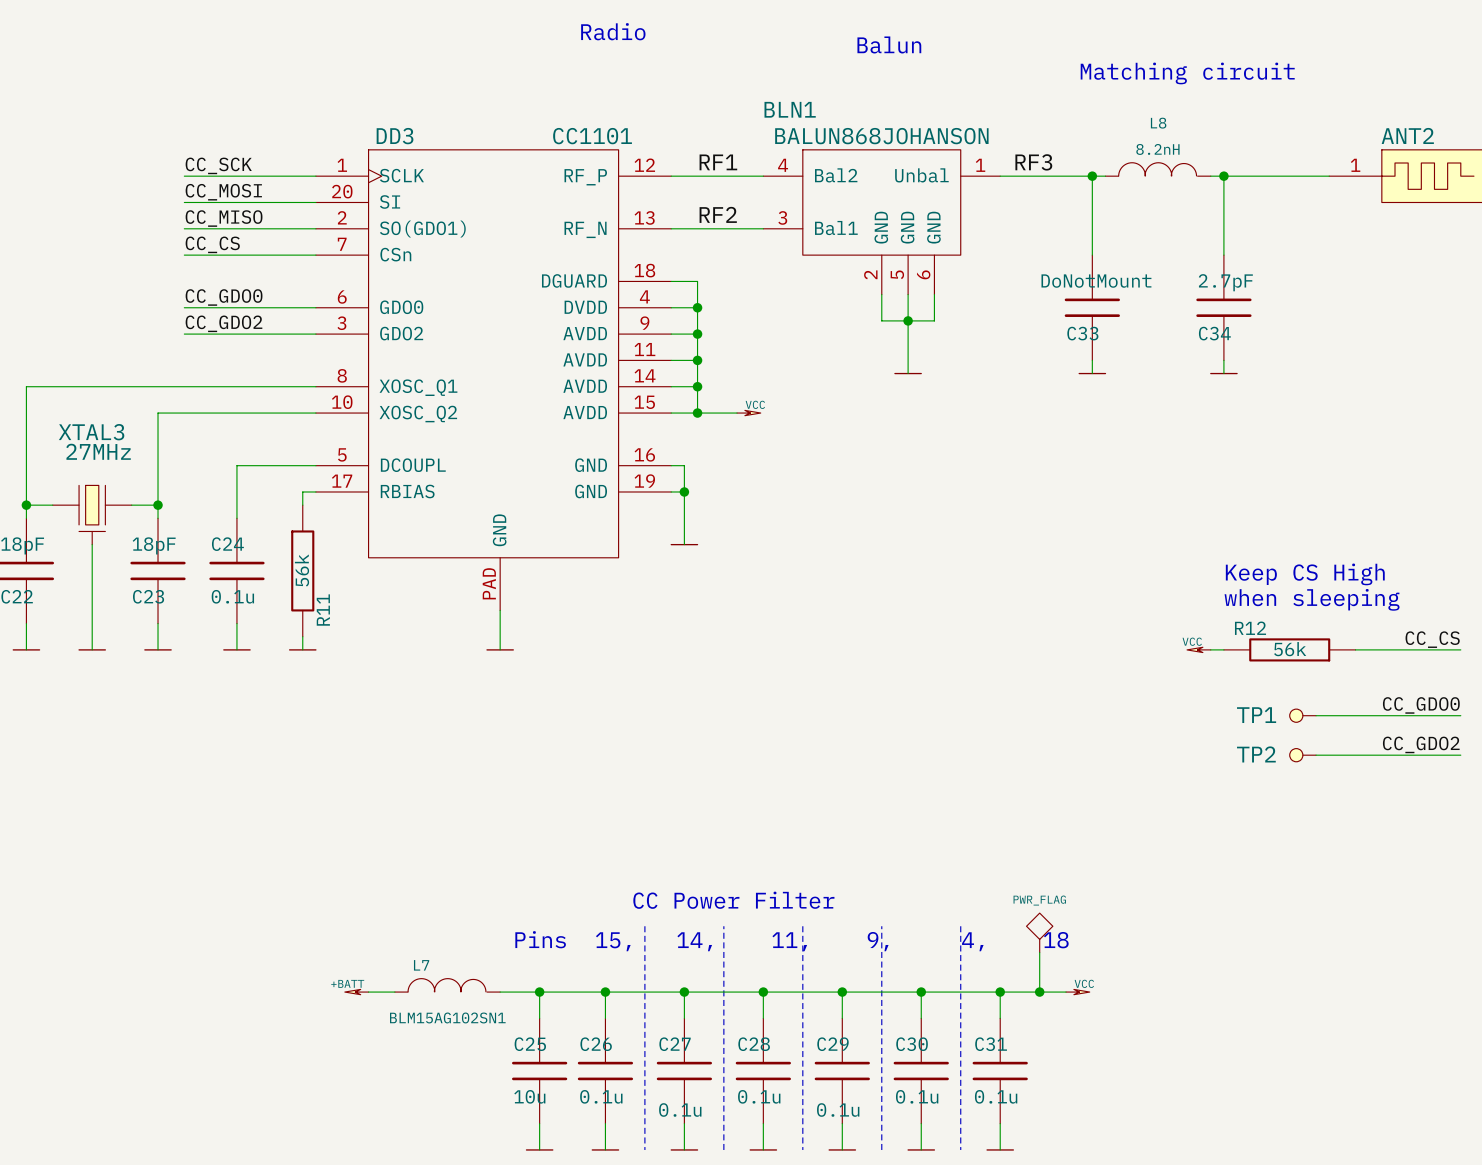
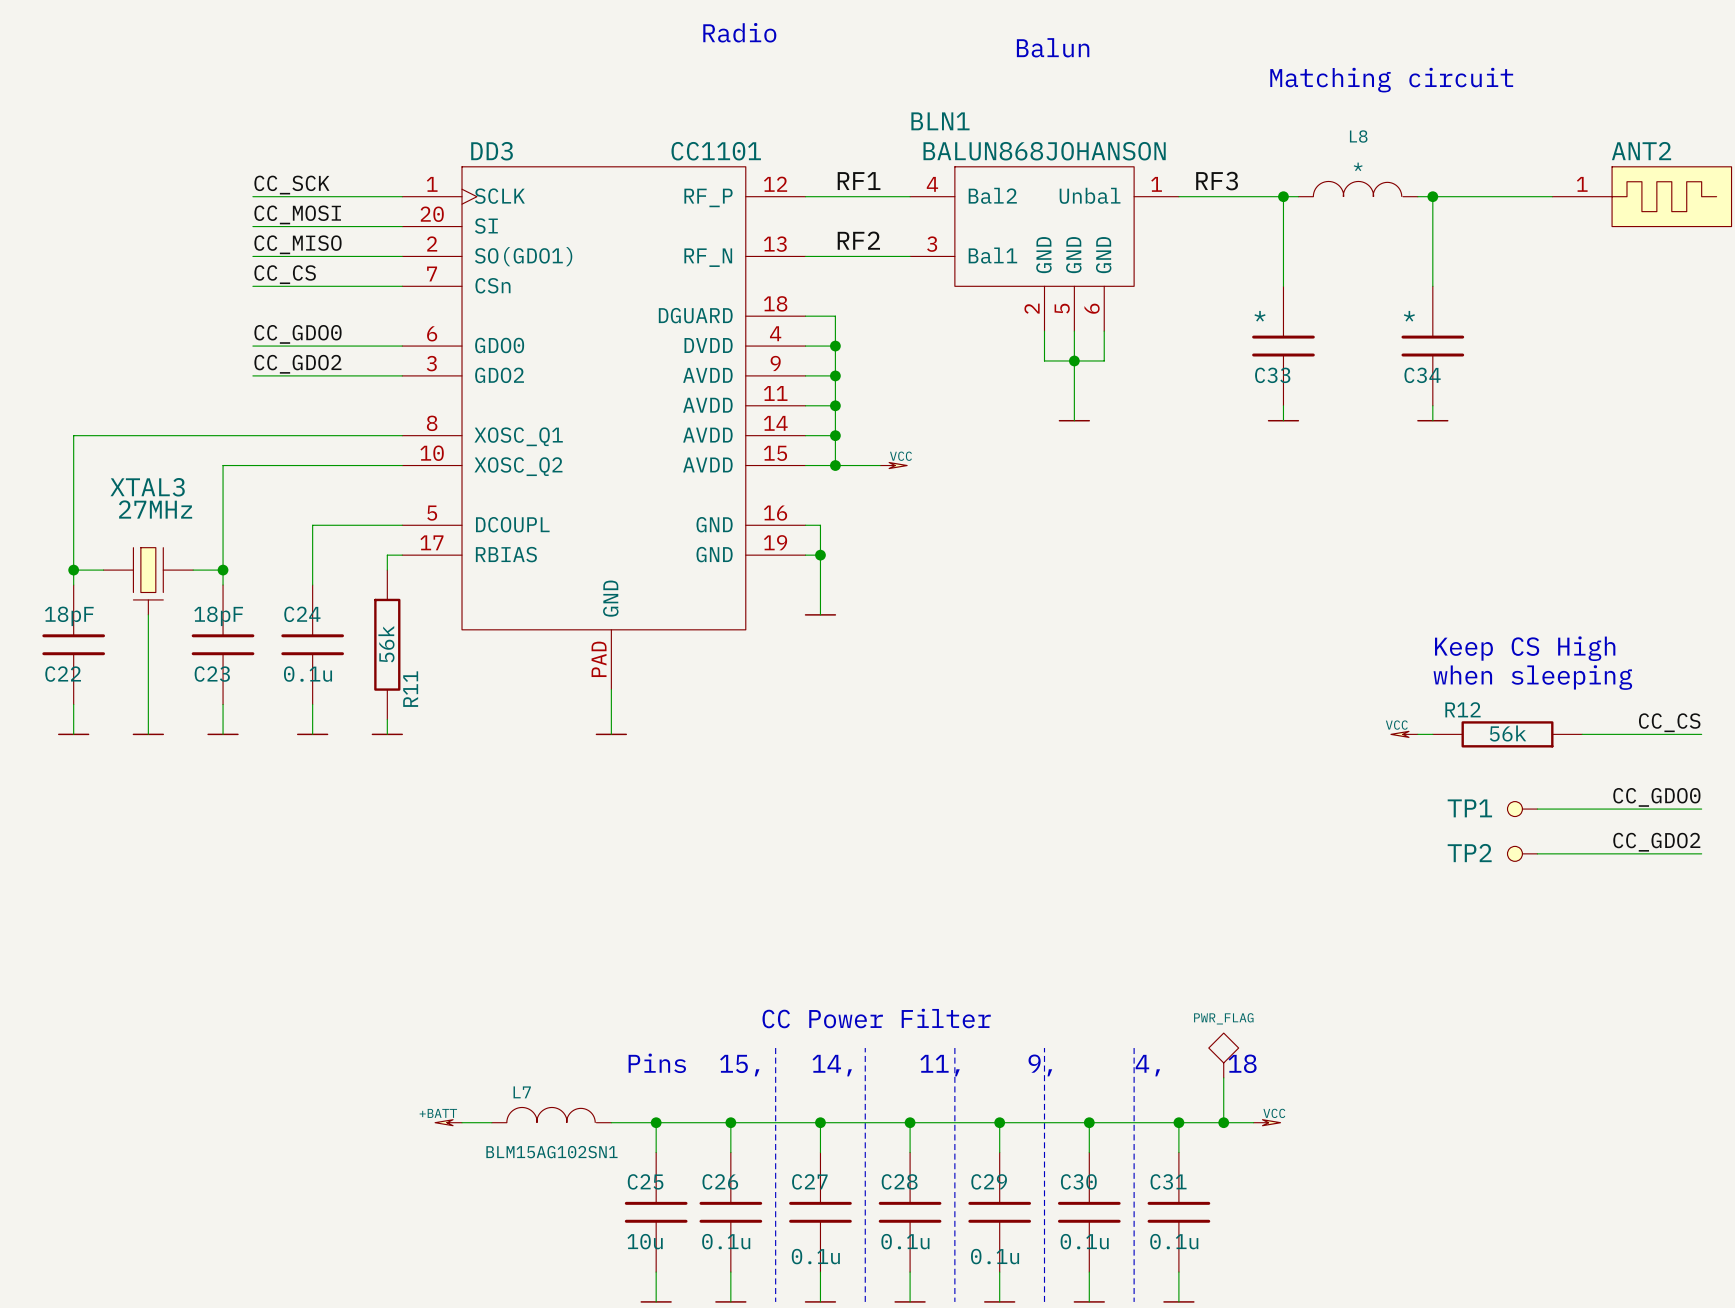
L8 value: 8.2nH (1157, 149) -> * (1358, 166)
C33 value: DoNotMount (1096, 281) -> * (1260, 316)
C34 value: 2.7pF (1225, 282) -> * (1409, 316)

